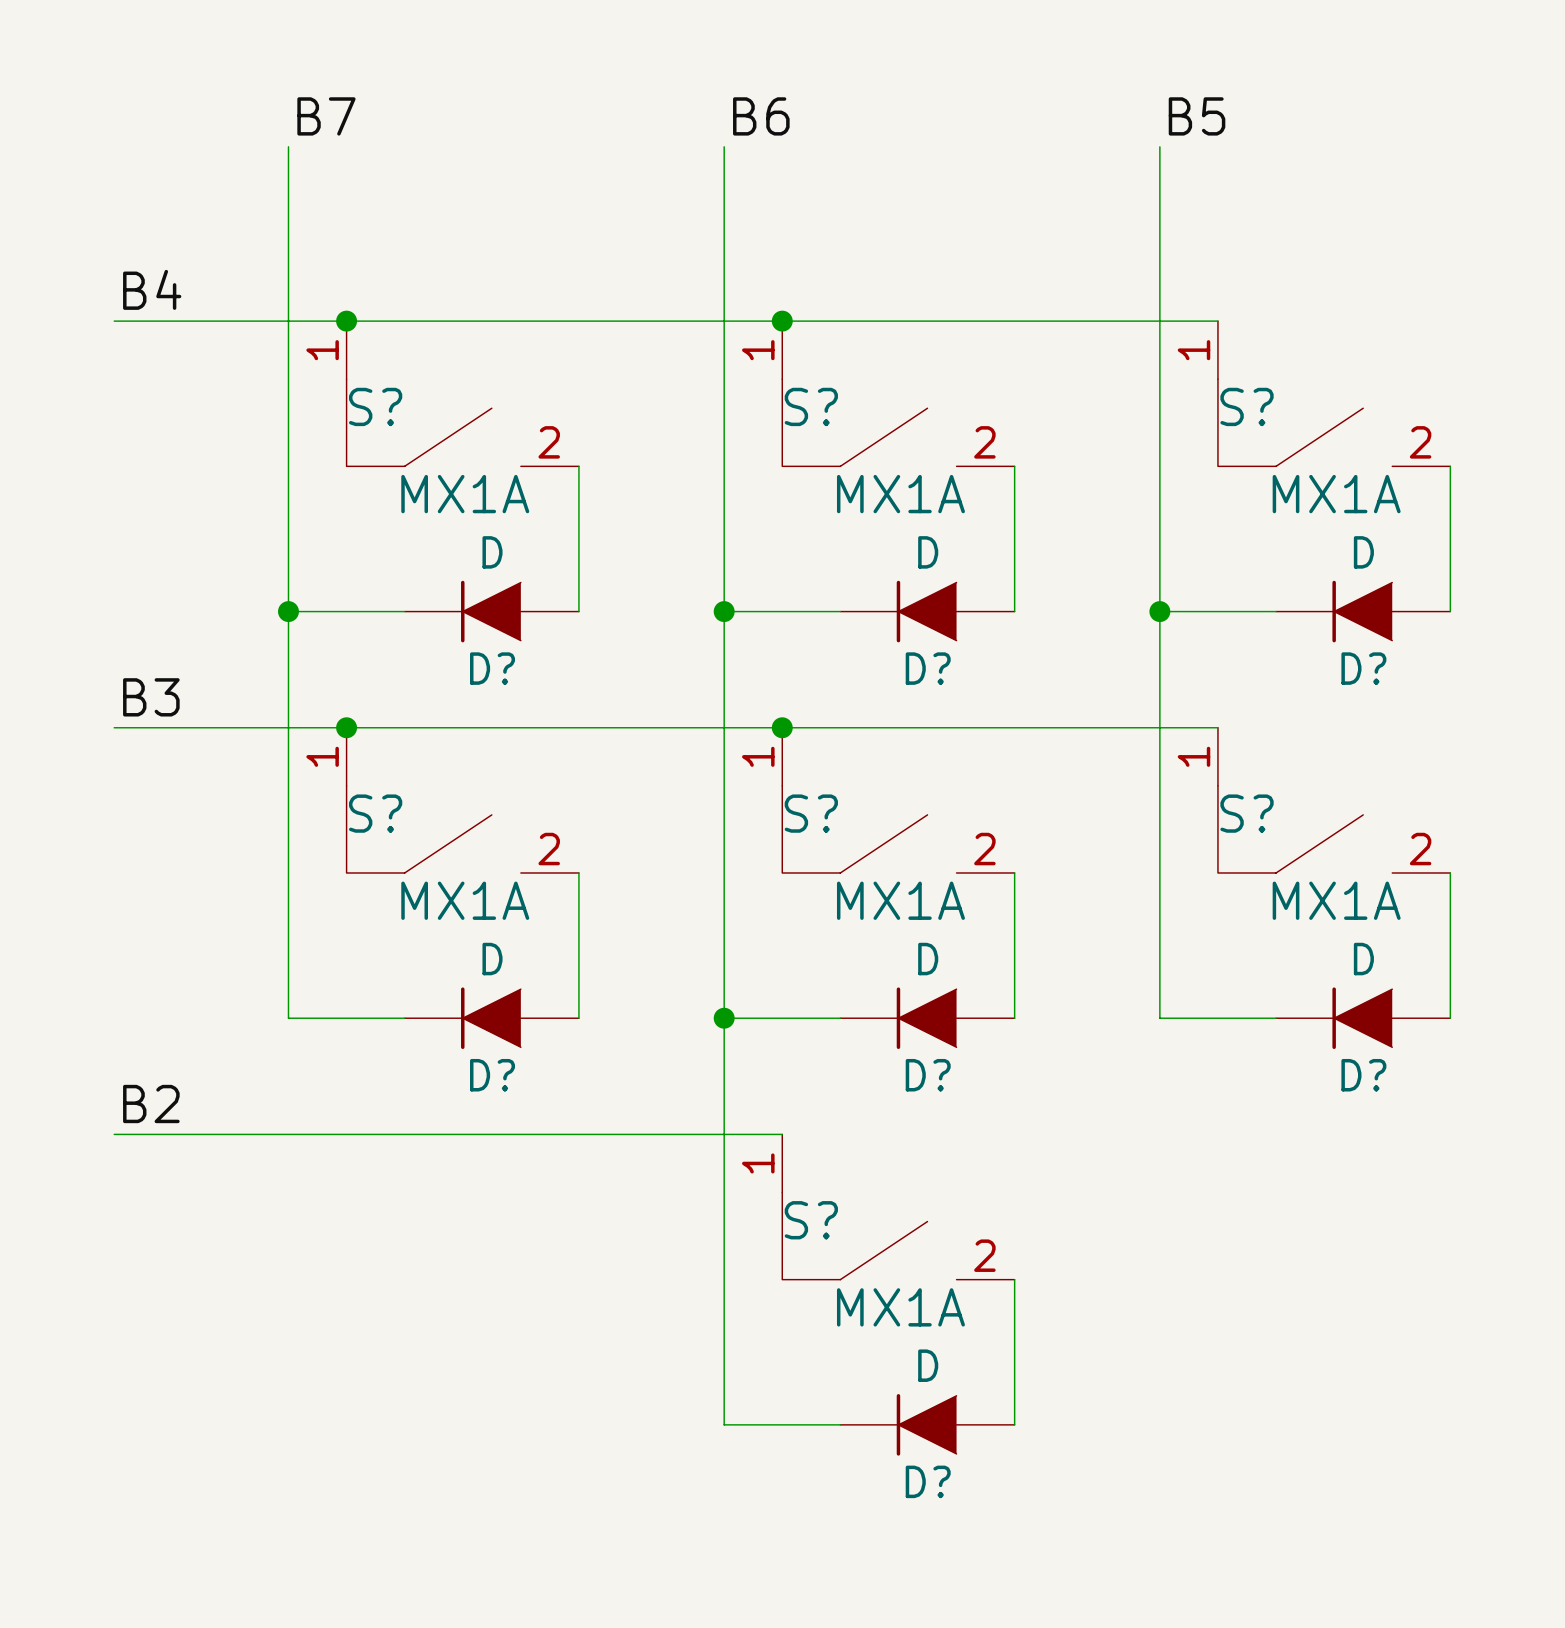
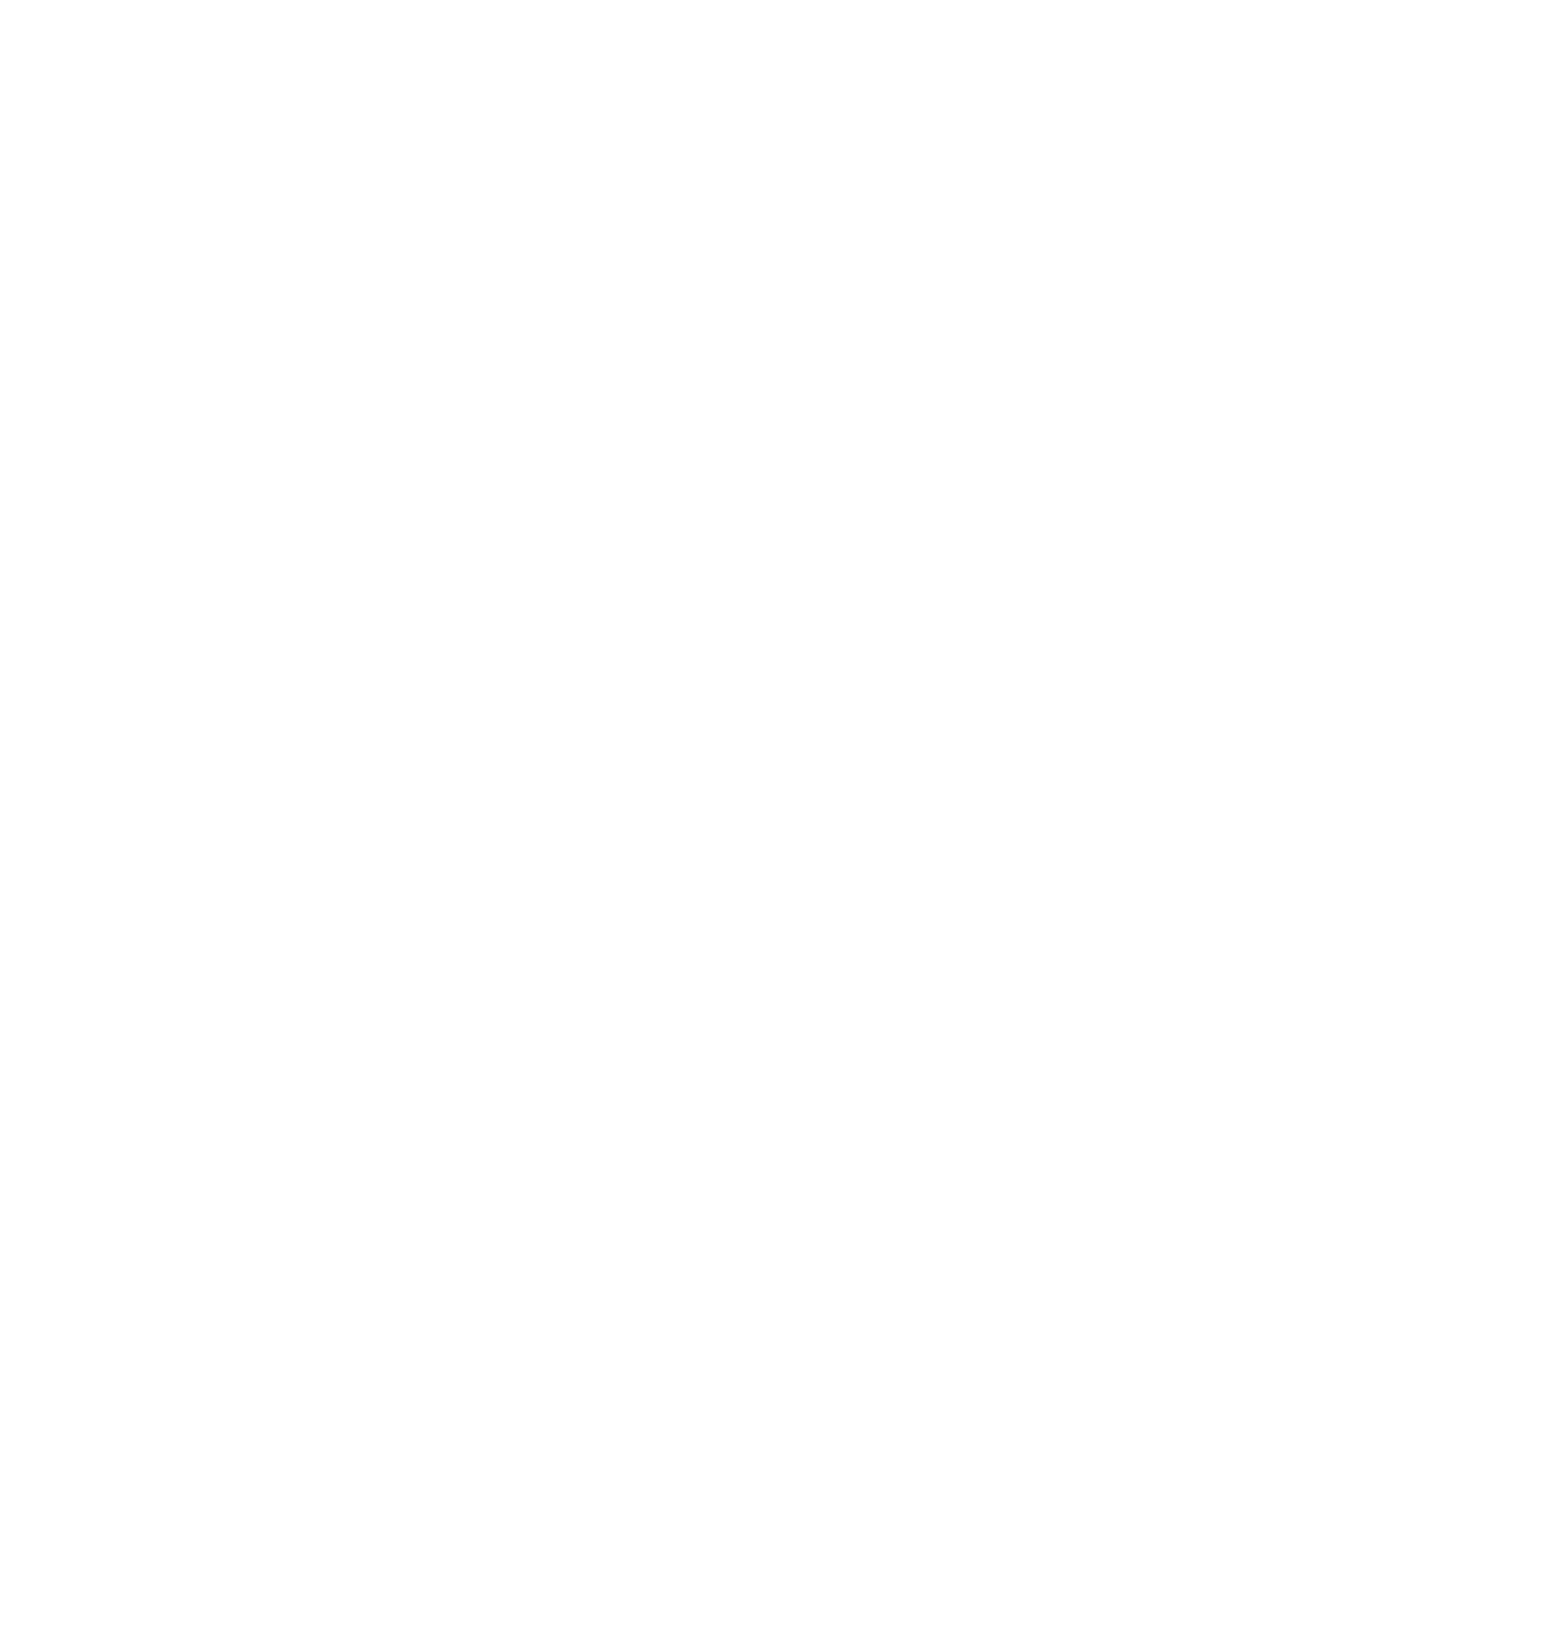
label: B7 (326, 116) -> none
label: B6 (761, 116) -> none
label: B5 (1197, 116) -> none
wire: (288, 146) (288, 1018) (404, 1018) -> none
wire: (724, 146) (724, 1424) (840, 1424) -> none
wire: (1159, 146) (1159, 1018) (1276, 1018) -> none
label: B4 (152, 289) -> none
wire: (114, 321) (1217, 321) -> none
junction: (346, 321) -> none
junction: (782, 321) -> none
S?: MX1A (462, 393) -> none
S?: MX1A (898, 393) -> none
S?: MX1A (1334, 393) -> none
wire: (578, 466) (578, 611) -> none
wire: (1014, 466) (1014, 611) -> none
wire: (1450, 466) (1450, 611) -> none
wire: (288, 611) (404, 611) -> none
junction: (288, 611) -> none
D?: D (491, 611) -> none
wire: (724, 611) (840, 611) -> none
junction: (724, 611) -> none
D?: D (927, 611) -> none
wire: (1159, 611) (1276, 611) -> none
junction: (1159, 611) -> none
D?: D (1363, 611) -> none
label: B3 (151, 697) -> none
wire: (114, 727) (1217, 727) -> none
junction: (346, 727) -> none
junction: (782, 727) -> none
S?: MX1A (462, 800) -> none
S?: MX1A (898, 800) -> none
S?: MX1A (1334, 800) -> none
wire: (578, 872) (578, 1018) -> none
wire: (1014, 872) (1014, 1018) -> none
wire: (1450, 872) (1450, 1018) -> none
D?: D (491, 1018) -> none
wire: (724, 1018) (840, 1018) -> none
junction: (724, 1018) -> none
D?: D (927, 1018) -> none
D?: D (1363, 1018) -> none
label: B2 (151, 1104) -> none
wire: (114, 1134) (782, 1134) -> none
S?: MX1A (898, 1207) -> none
wire: (1014, 1279) (1014, 1424) -> none
D?: D (927, 1424) -> none

